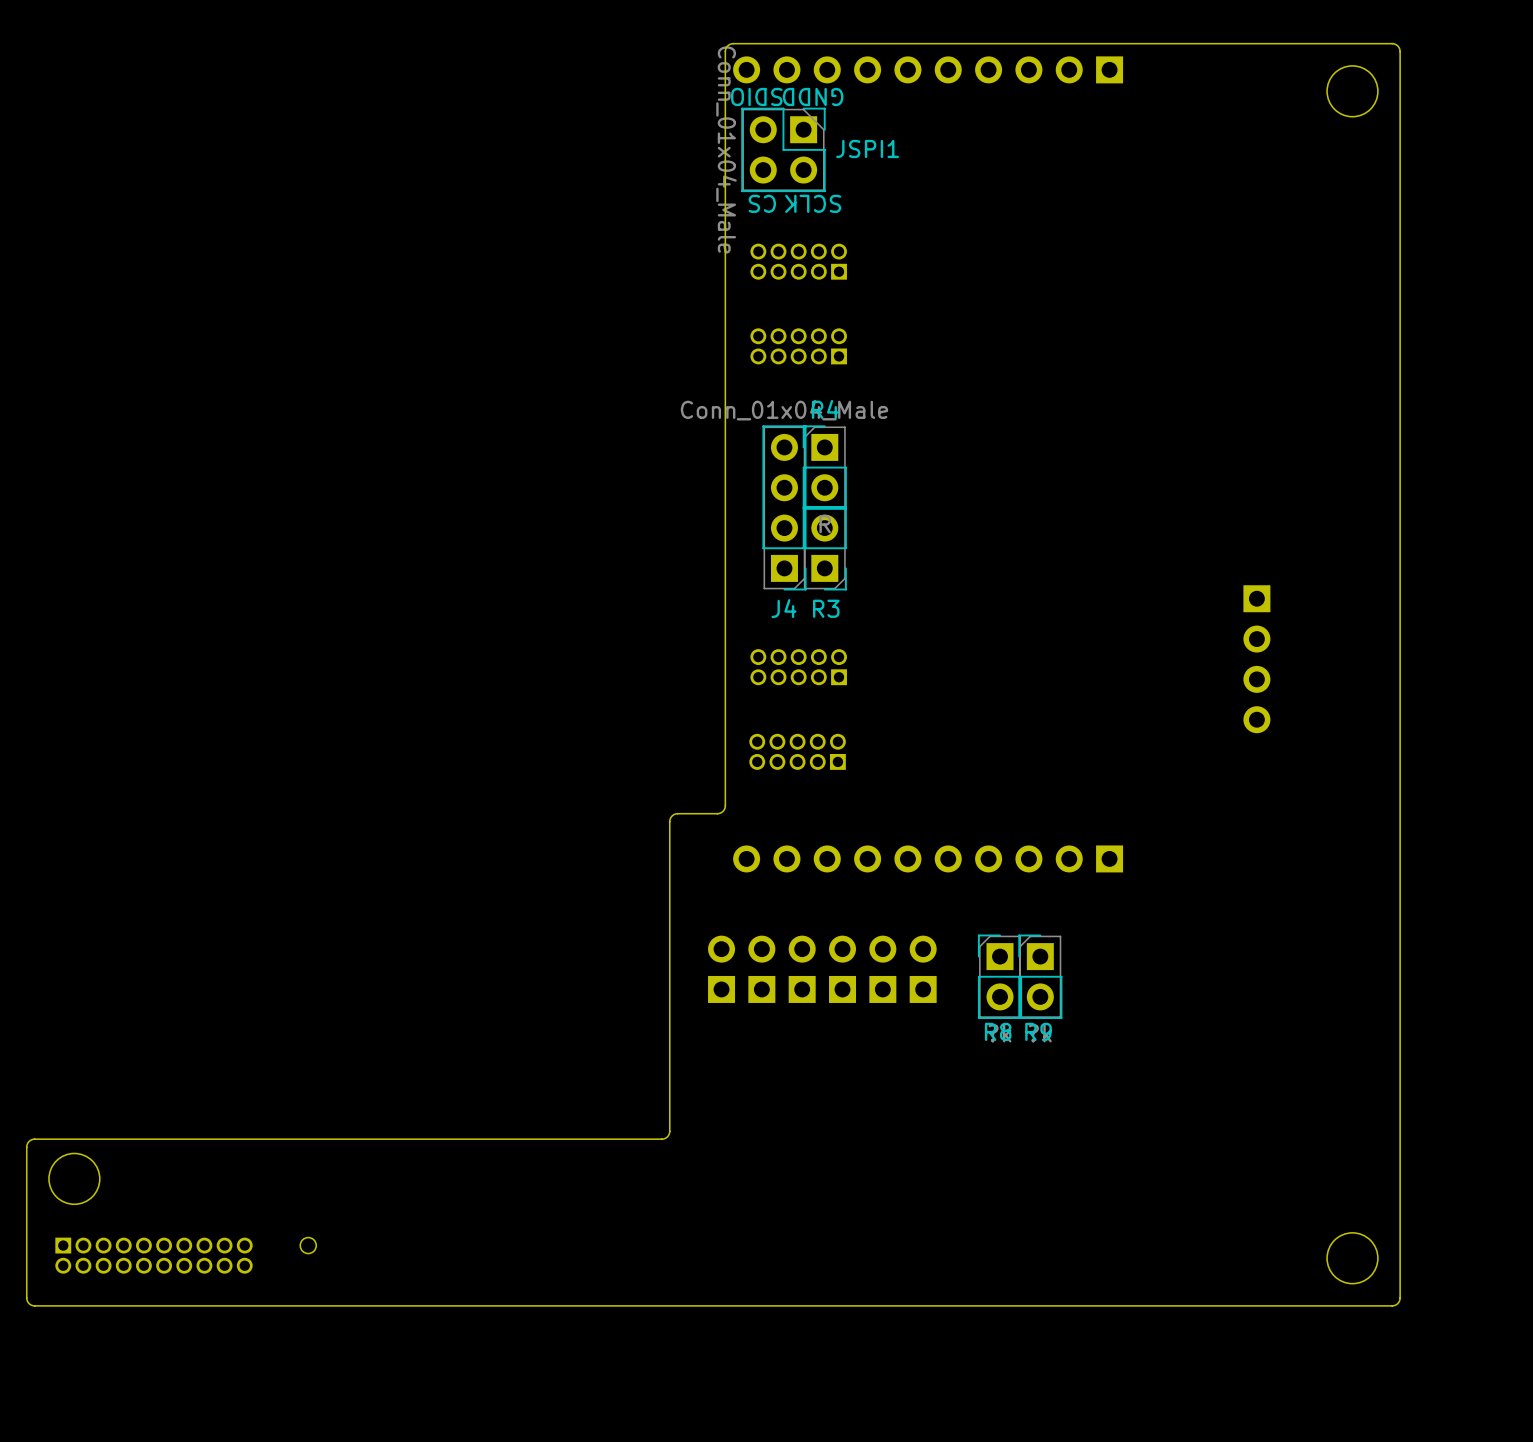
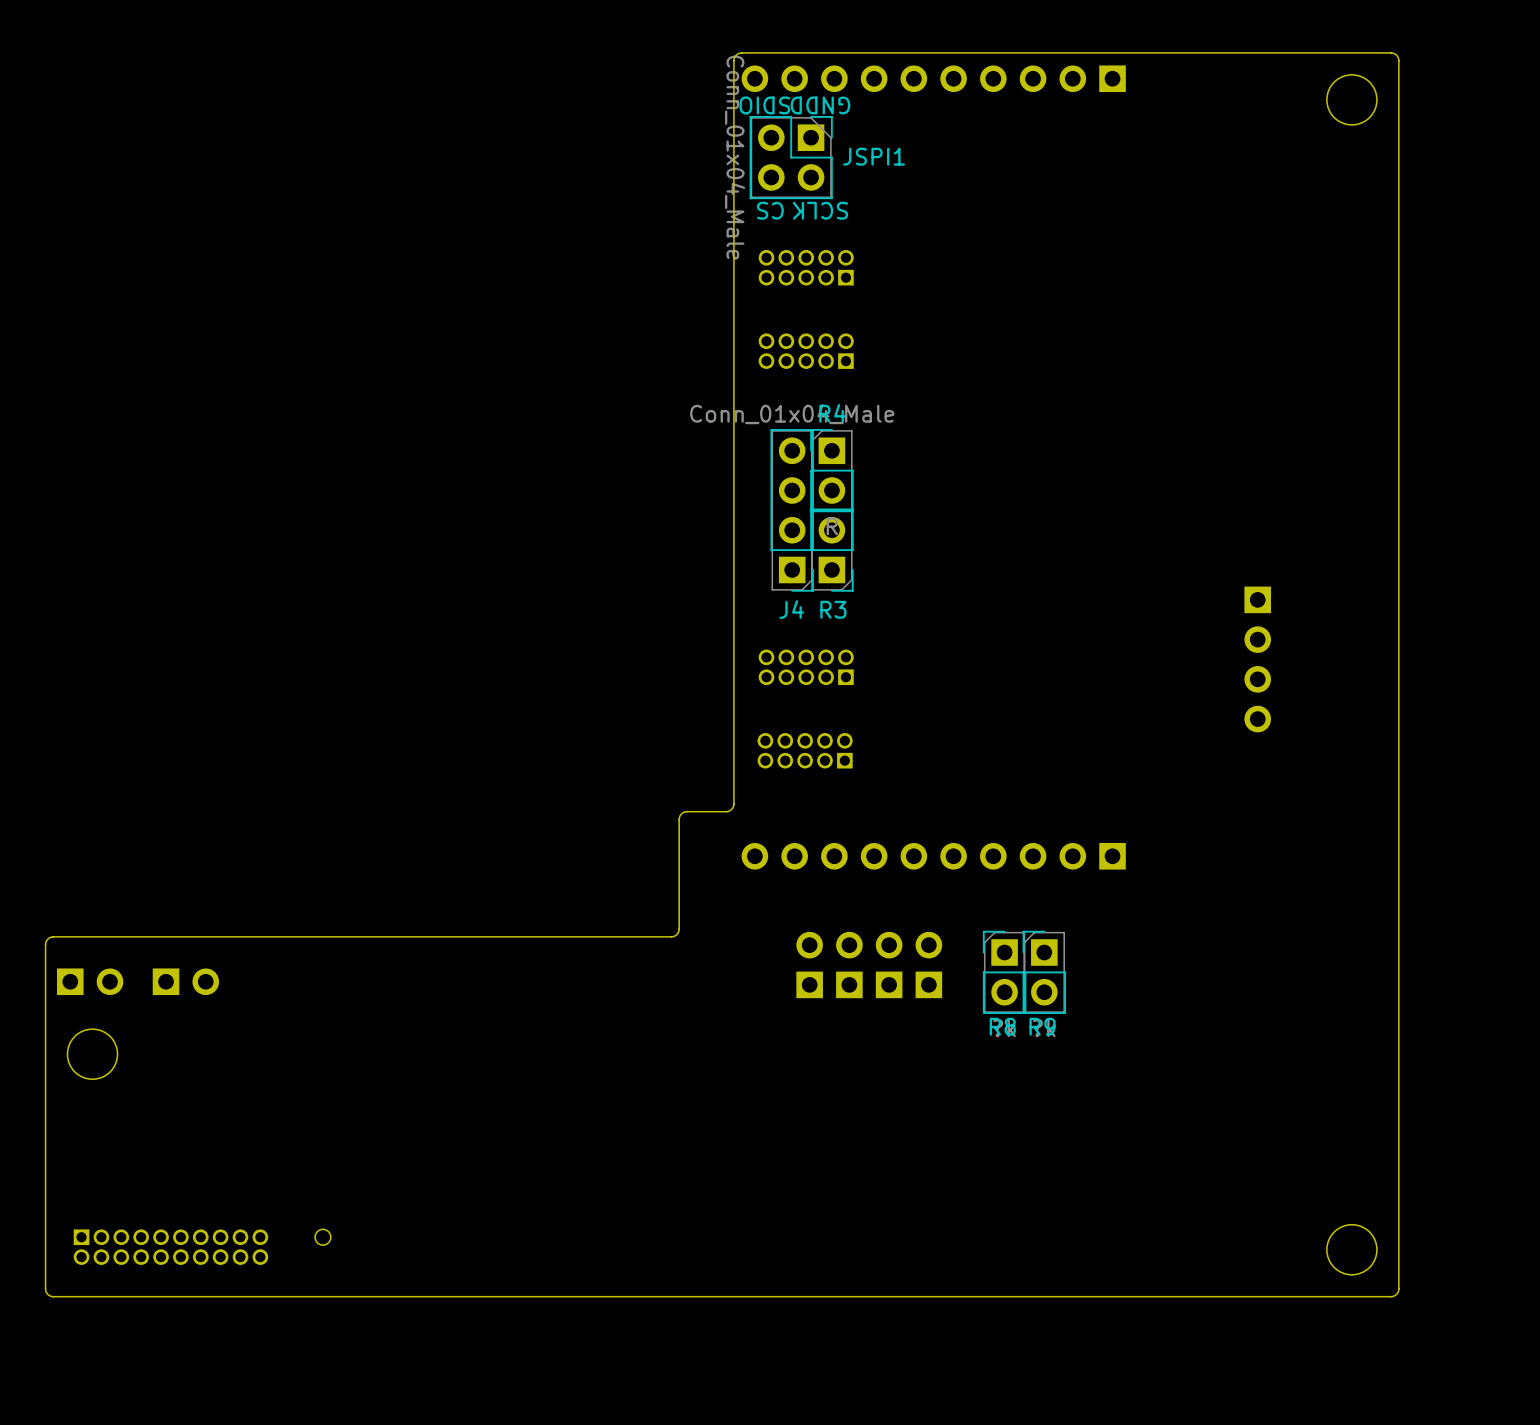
board edge: (669, 932) (669, 1131) (668, 1136) (663, 1138) (34, 1139) (29, 1141) (26, 1147) -> (679, 929) (676, 934) (671, 936) (51, 937) (47, 939) (45, 944) (45, 1140)
part: (721, 969) -> none
part: (761, 969) -> none
part: none -> (90, 981)
part: none -> (185, 981)
round board edge position: (74, 1178) -> (92, 1054)

